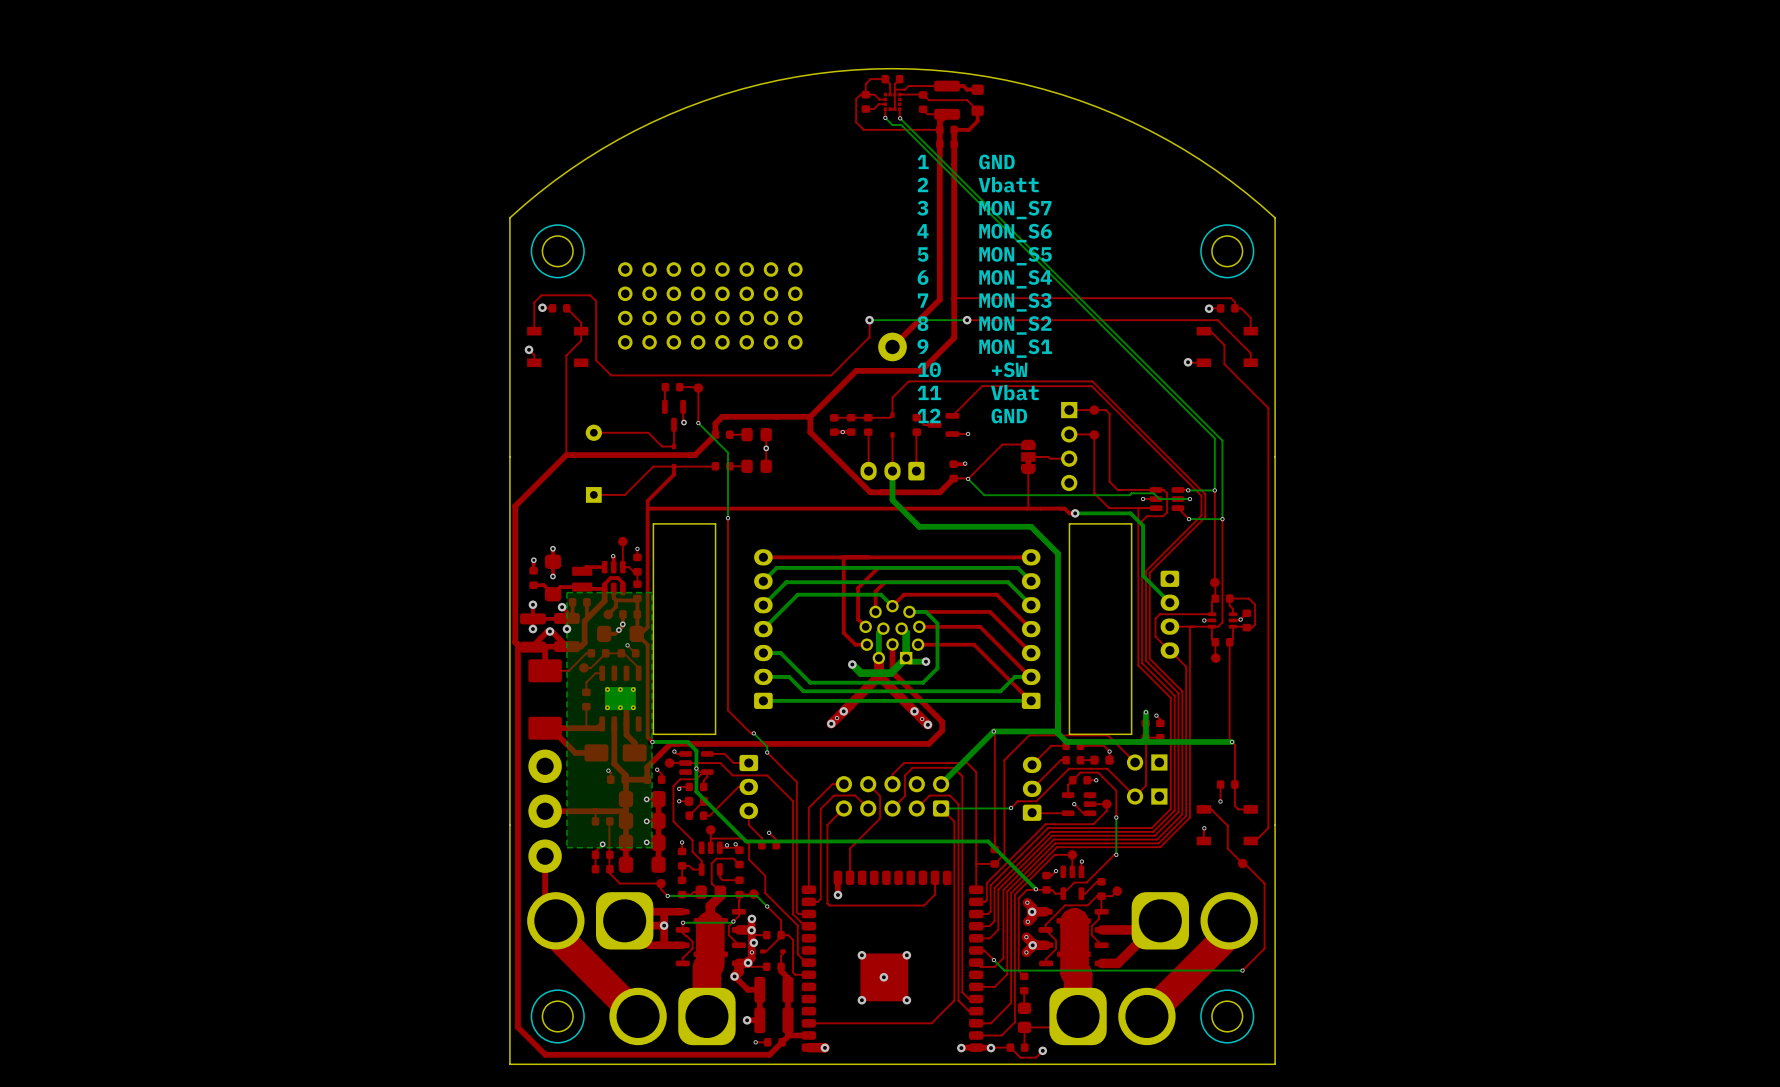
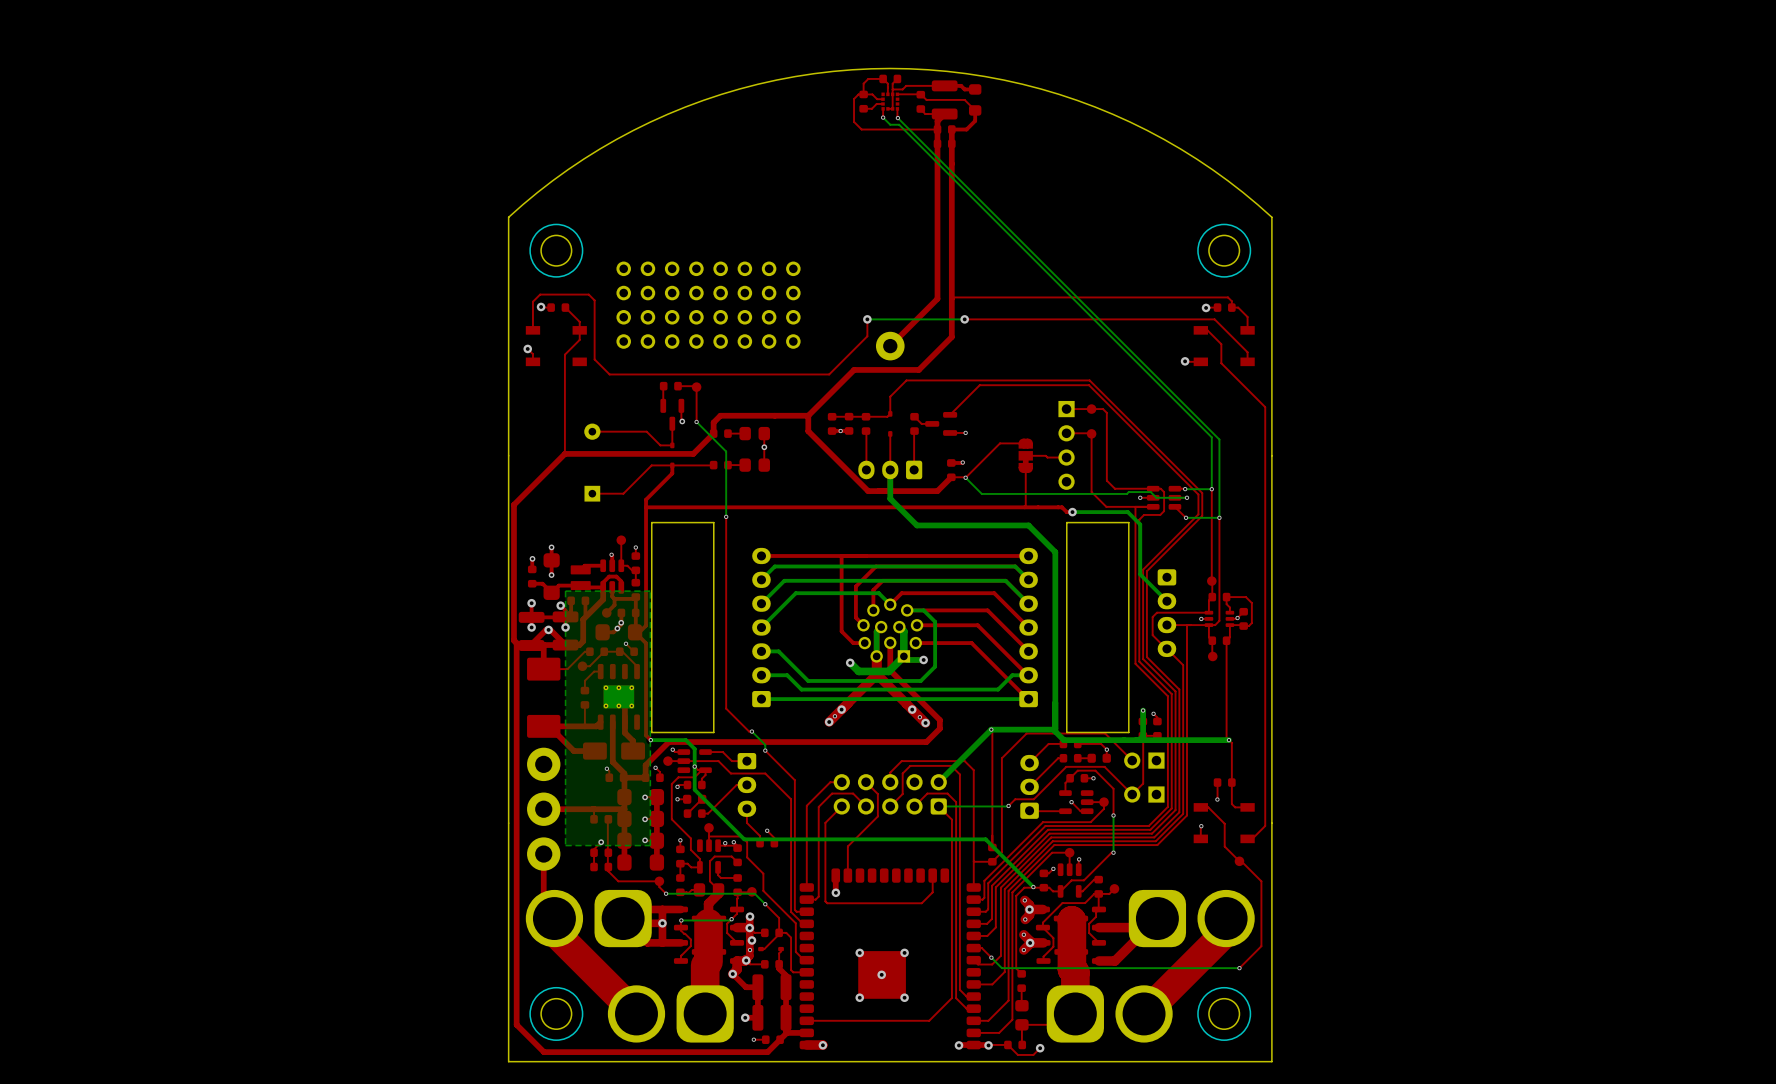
text: 1 GND (966, 161) -> none
text: 2 Vbatt (978, 184) -> none
text: 3 MON_S7 (984, 210) -> none
text: 4 MON_S6 (984, 233) -> none
text: 5 MON_S5 (984, 256) -> none
text: 6 MON_S4 (984, 279) -> none
text: 7 MON_S3 (984, 302) -> none
text: 8 MON_S2 (984, 325) -> none
text: 9 MON_S1 (984, 348) -> none
text: 10 +SW (972, 369) -> none
text: 11 Vbat (978, 392) -> none
text: 12 GND (972, 416) -> none

